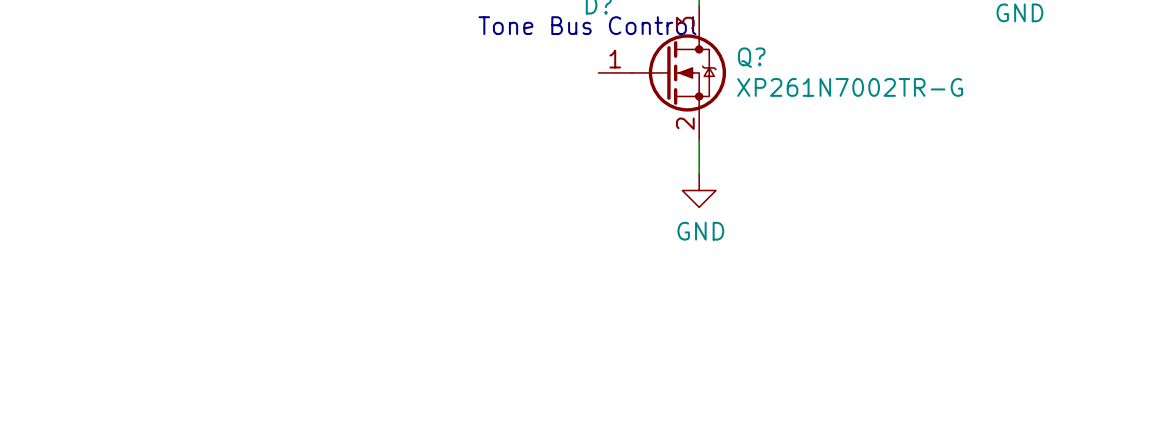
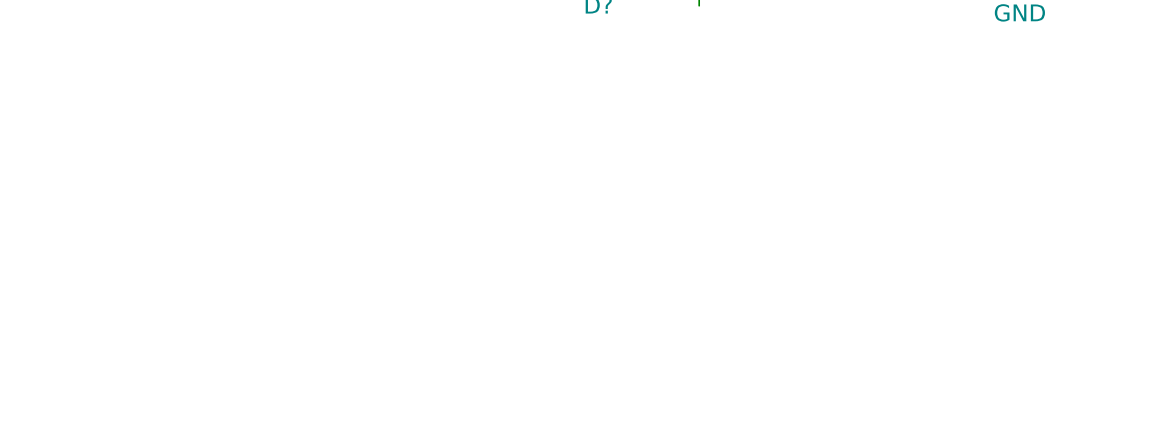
text: Tone Bus Control (587, 25) -> none
Q?: XP261N7002TR-G (662, 72) -> none
wire: (699, 140) (699, 173) -> none
power symbol: GND (699, 190) -> none

